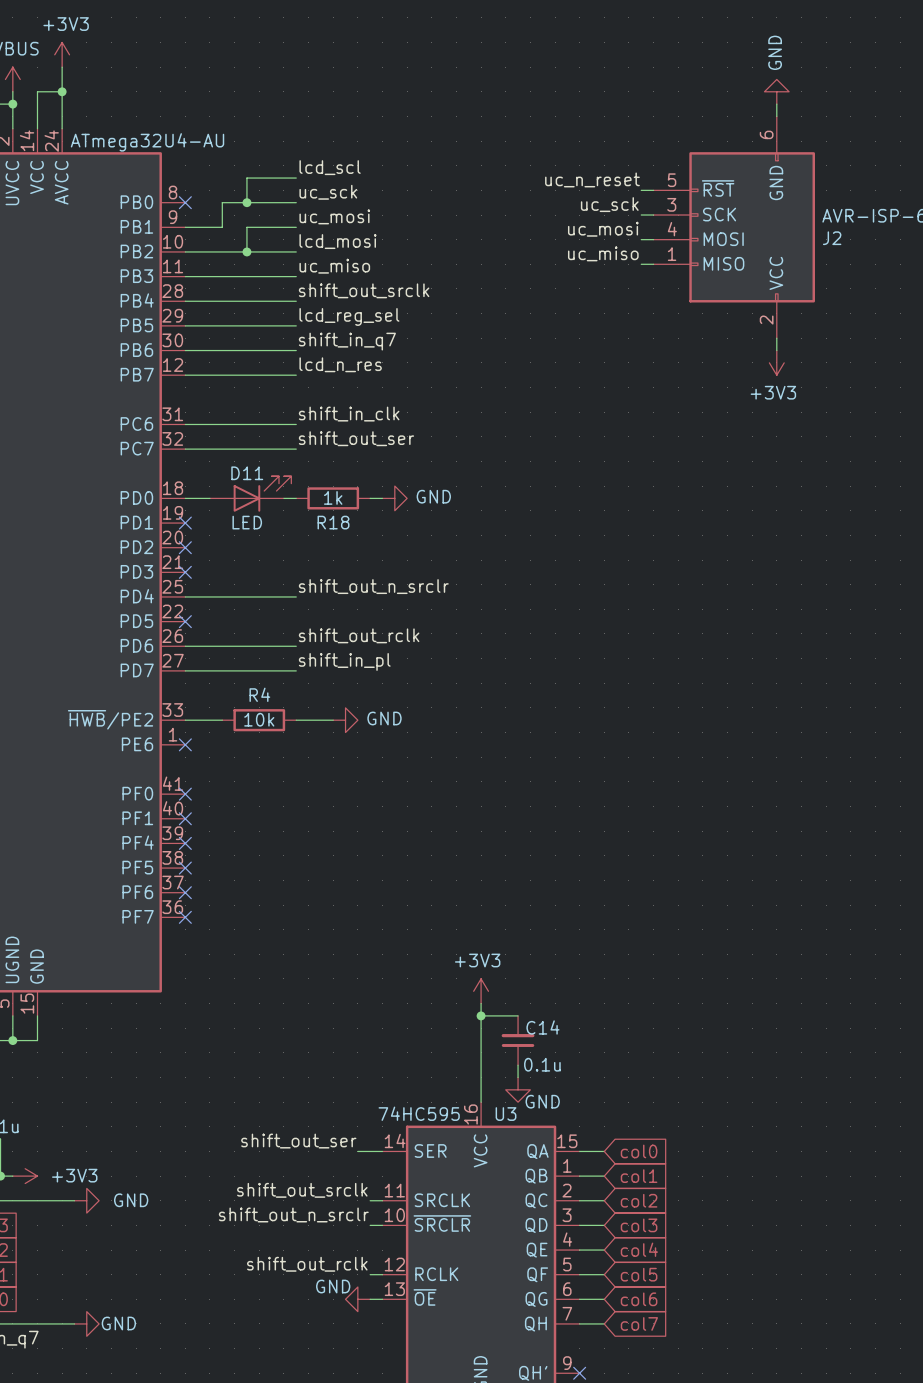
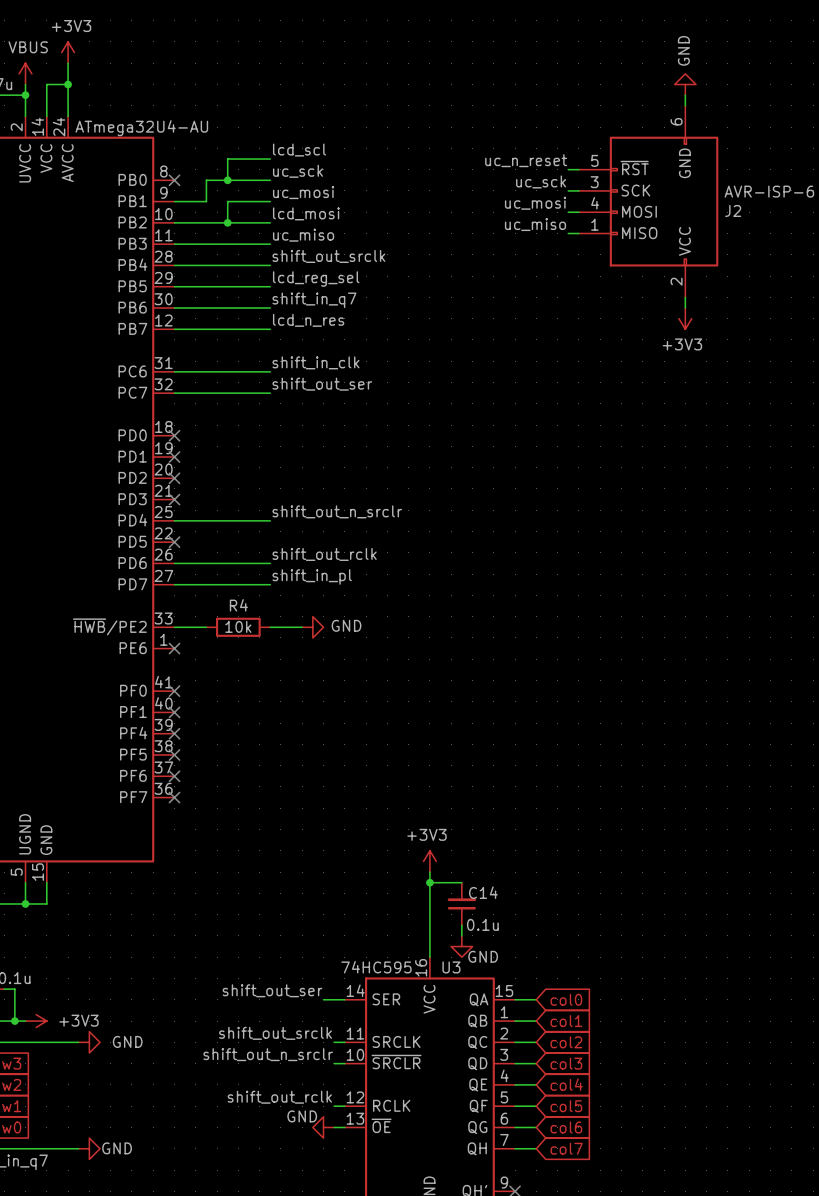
D11: LED (250, 493) -> none
wire: (185, 498) (209, 498) -> none
no-connect mark: none -> (174, 435)
wire: (283, 498) (296, 498) -> none
R18: 1k (333, 498) -> none
wire: (370, 498) (382, 498) -> none
power symbol: GND (394, 498) -> none

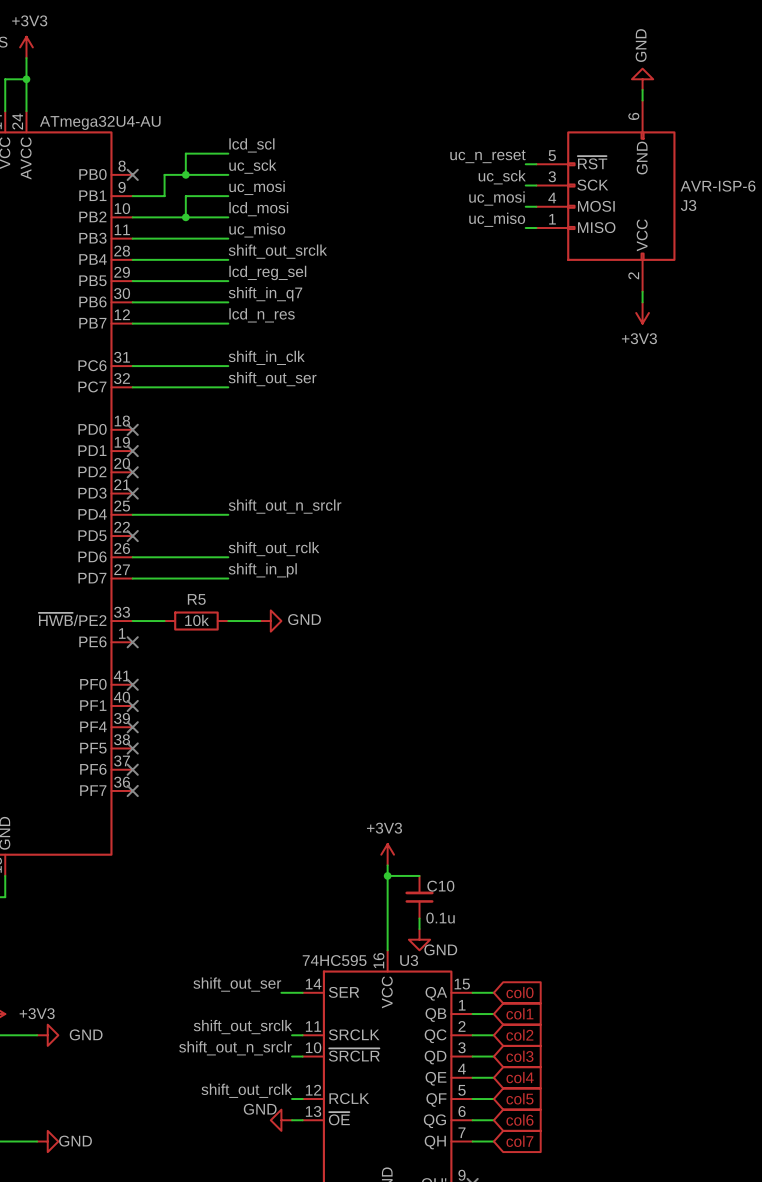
J2 name: J2 (733, 210) -> J3 (688, 205)
R4 name: R4 (238, 605) -> R5 (196, 599)
C14 name: C14 (483, 892) -> C10 (440, 886)

